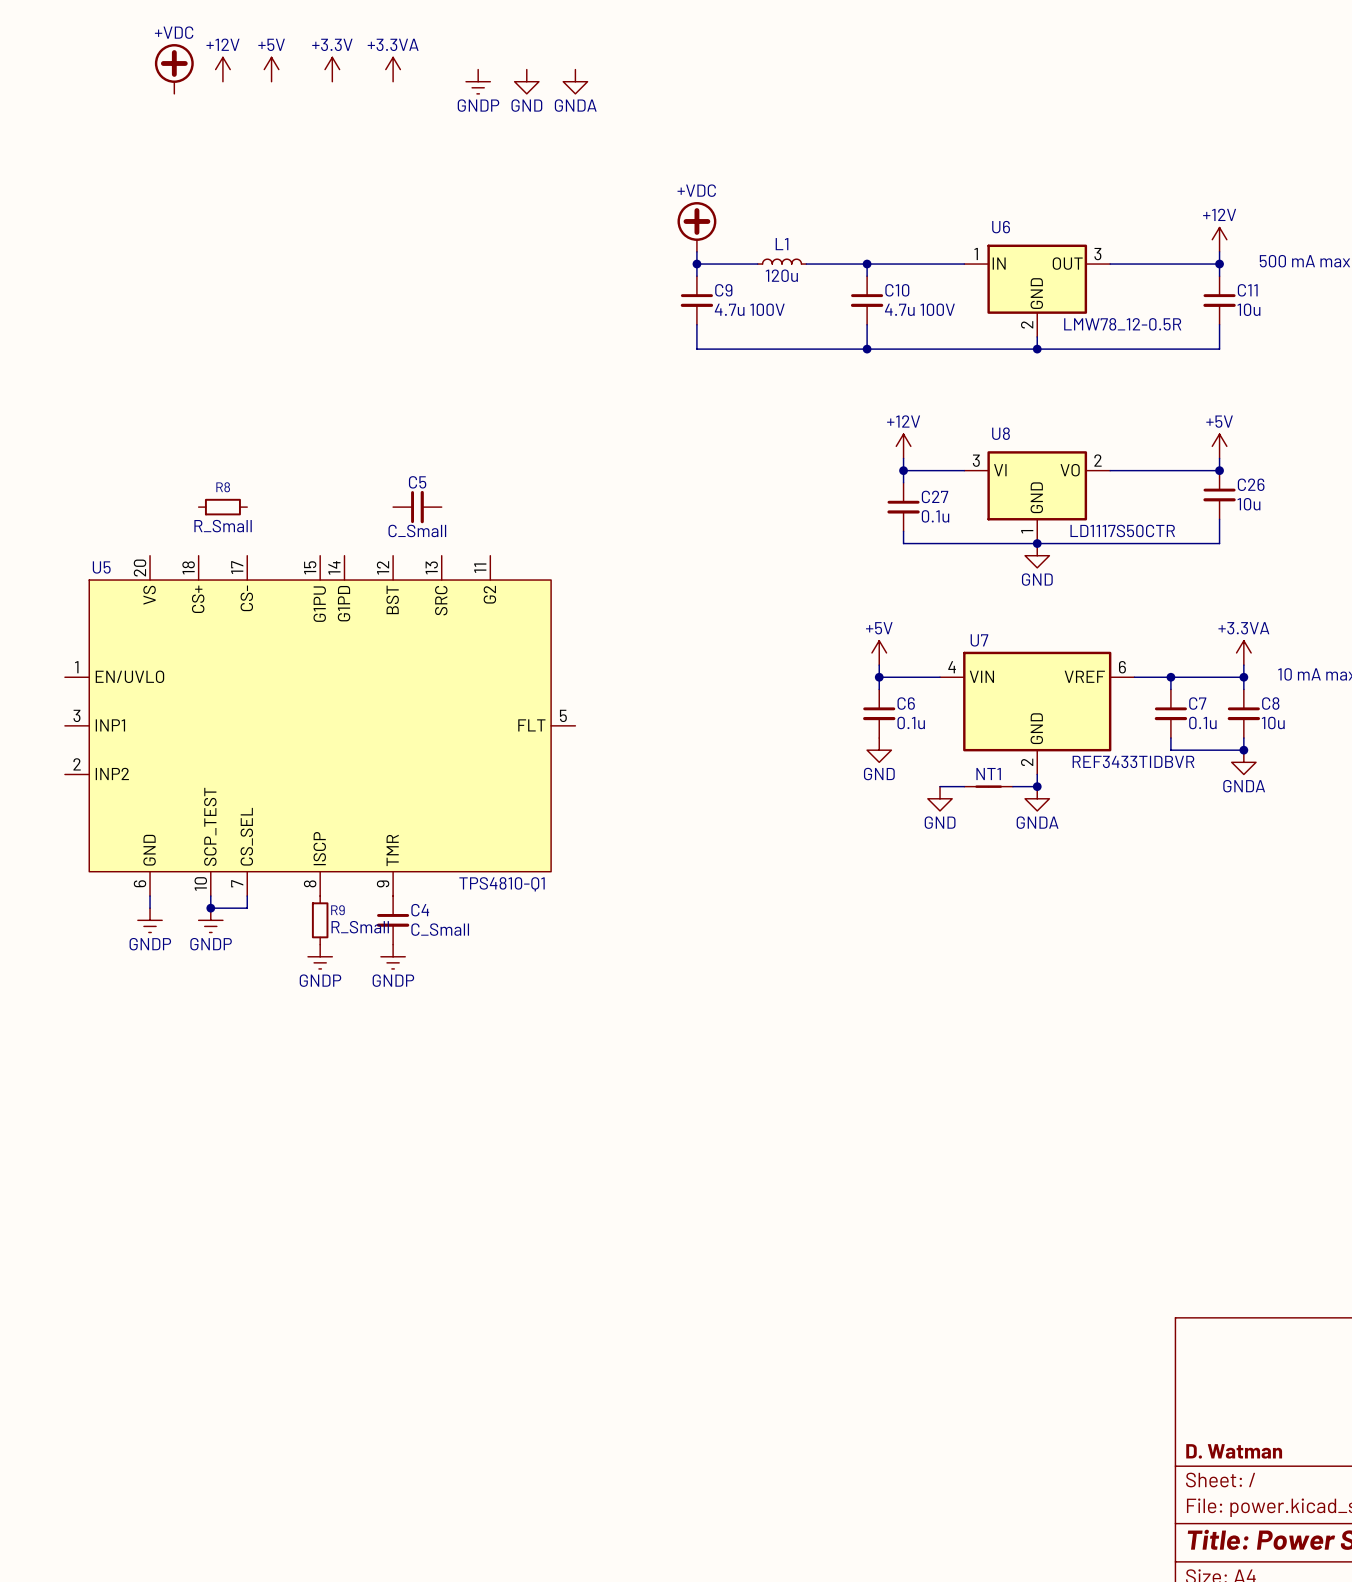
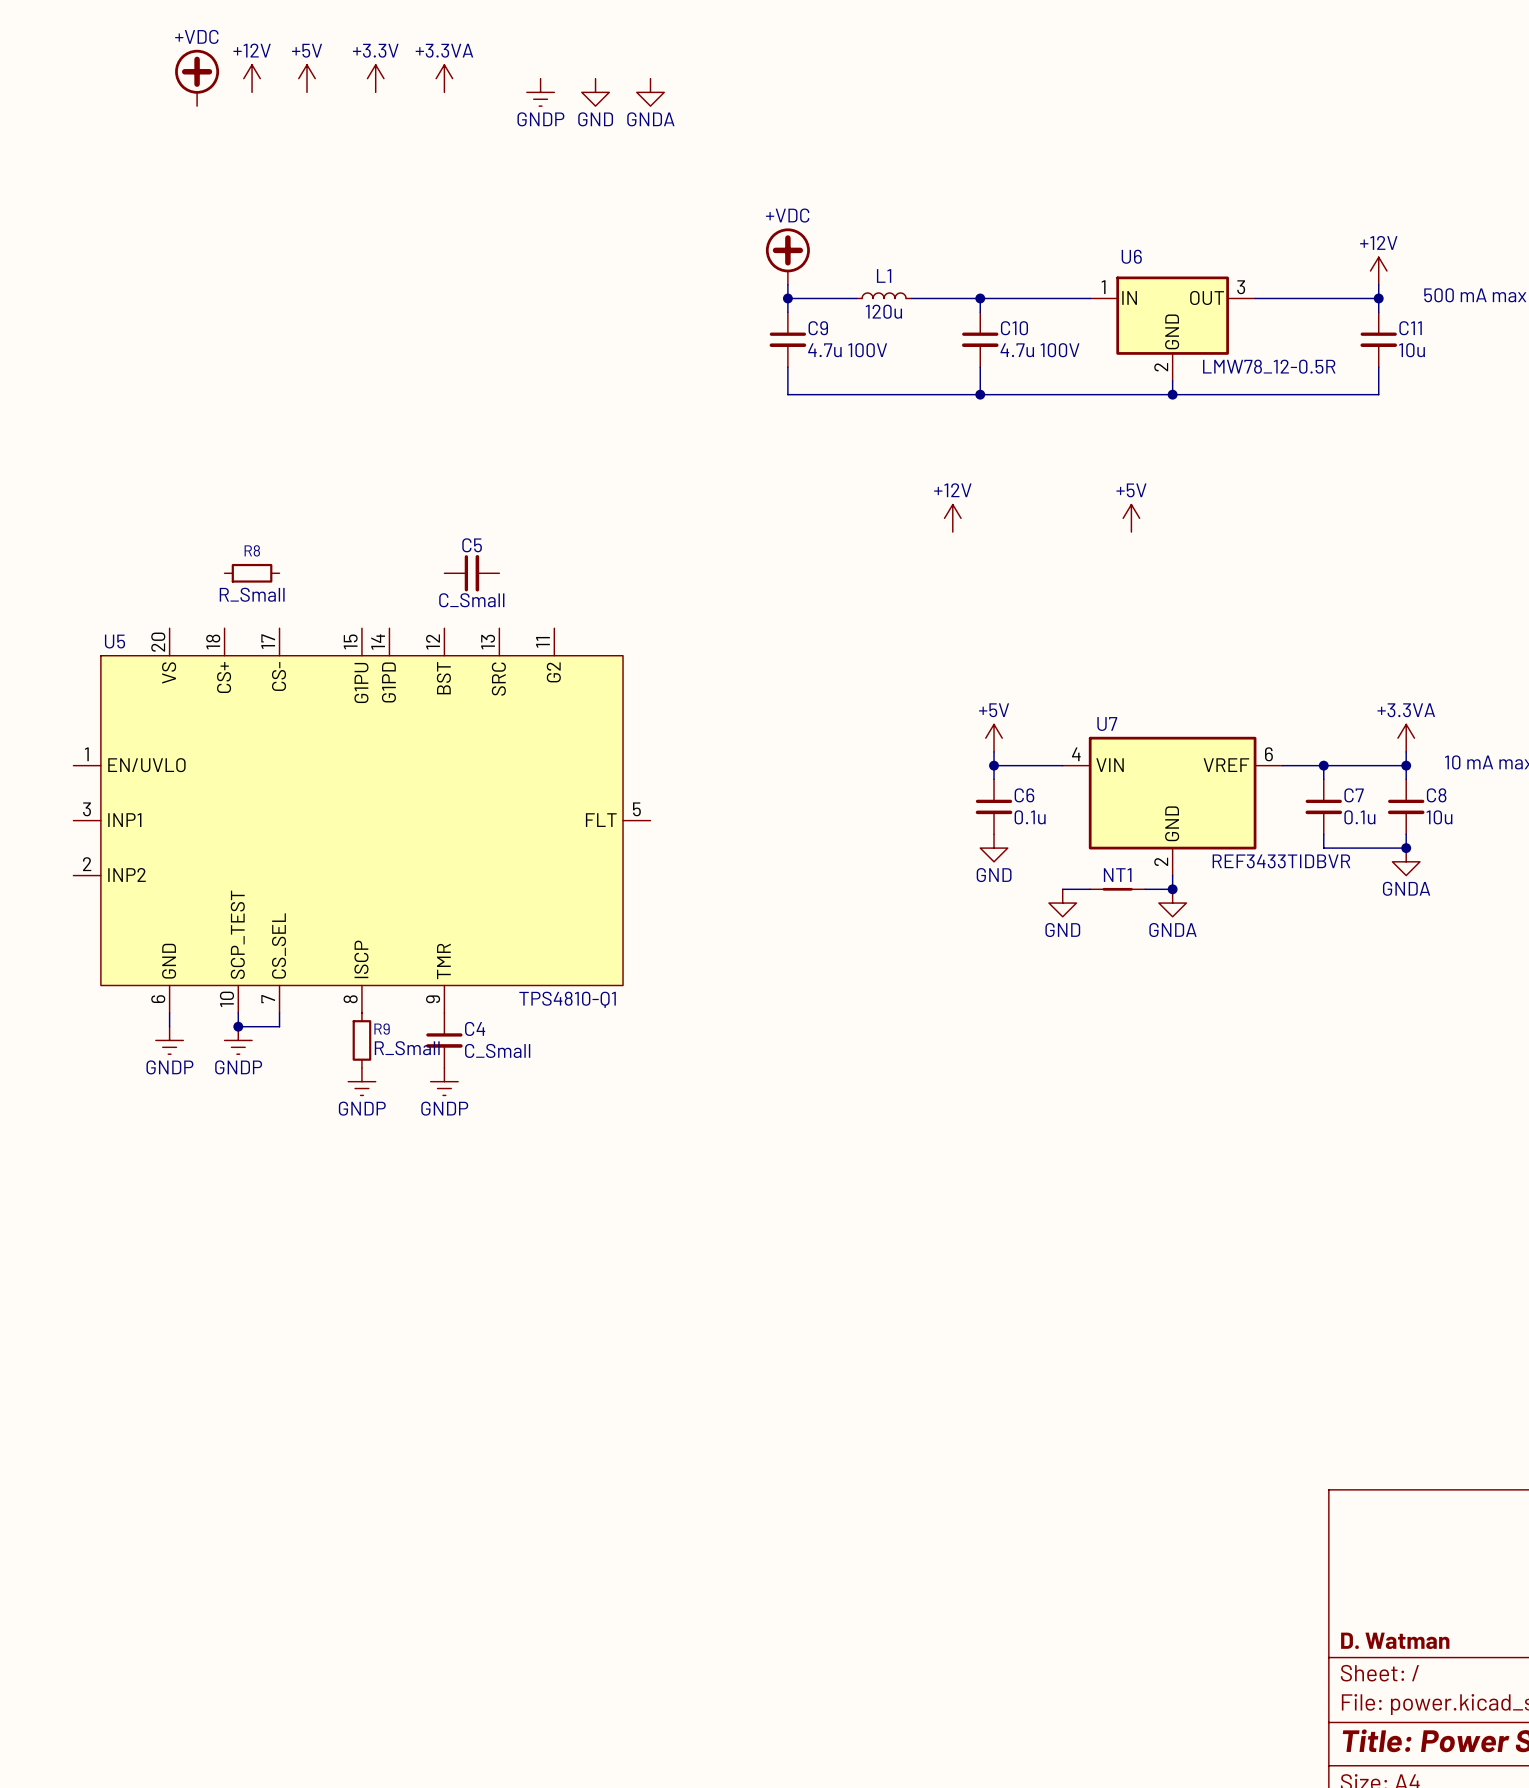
power symbol position: +12V (903, 446) -> +12V (952, 518)
power symbol position: +5V (1219, 446) -> +5V (1131, 518)
wire: (903, 458) (903, 482) -> none
wire: (1219, 458) (1219, 470) (1110, 470) -> none
wire: (903, 470) (964, 470) -> none
junction: (903, 470) -> none
junction: (1219, 470) -> none
C26: 10u (1219, 494) -> none
U8: LD1117S50CTR (1037, 497) -> none
C27: 0.1u (903, 507) -> none
wire: (1219, 519) (1219, 543) (903, 543) (903, 531) -> none
junction: (1037, 543) -> none
power symbol: GND (1037, 555) -> none

